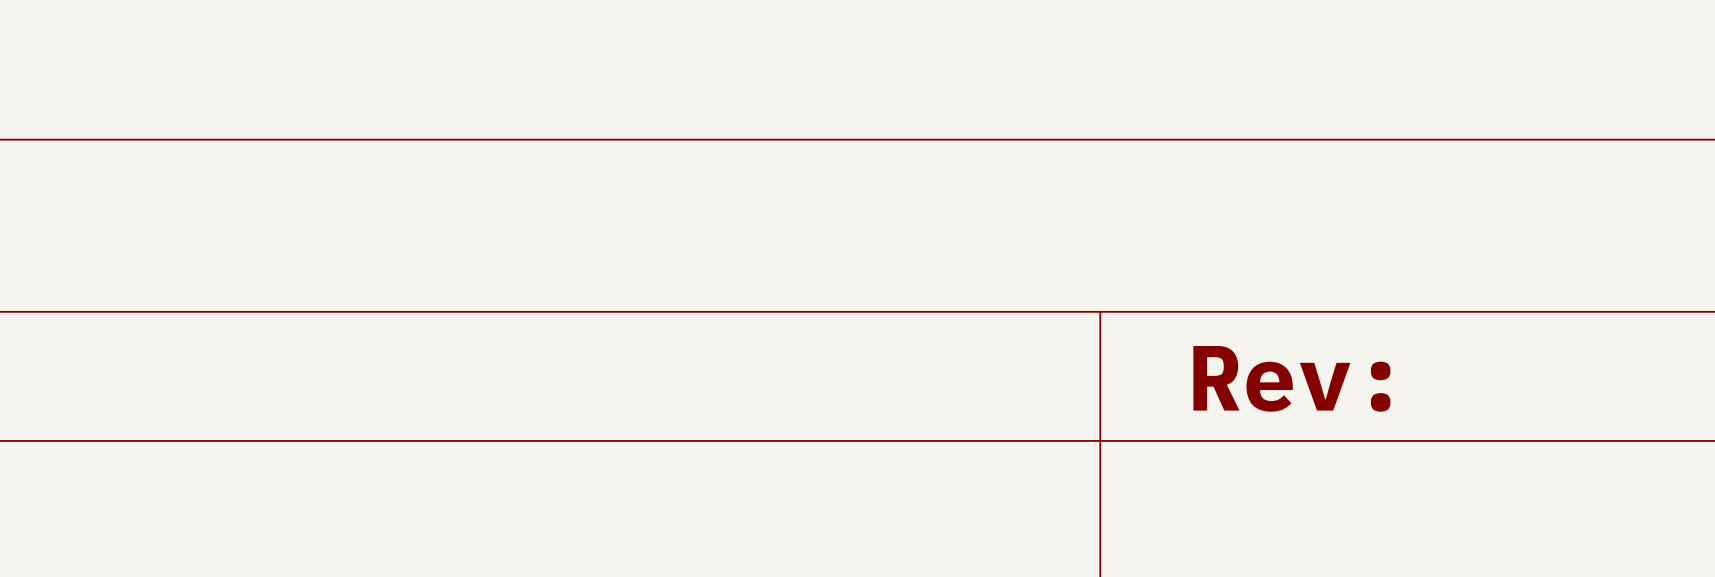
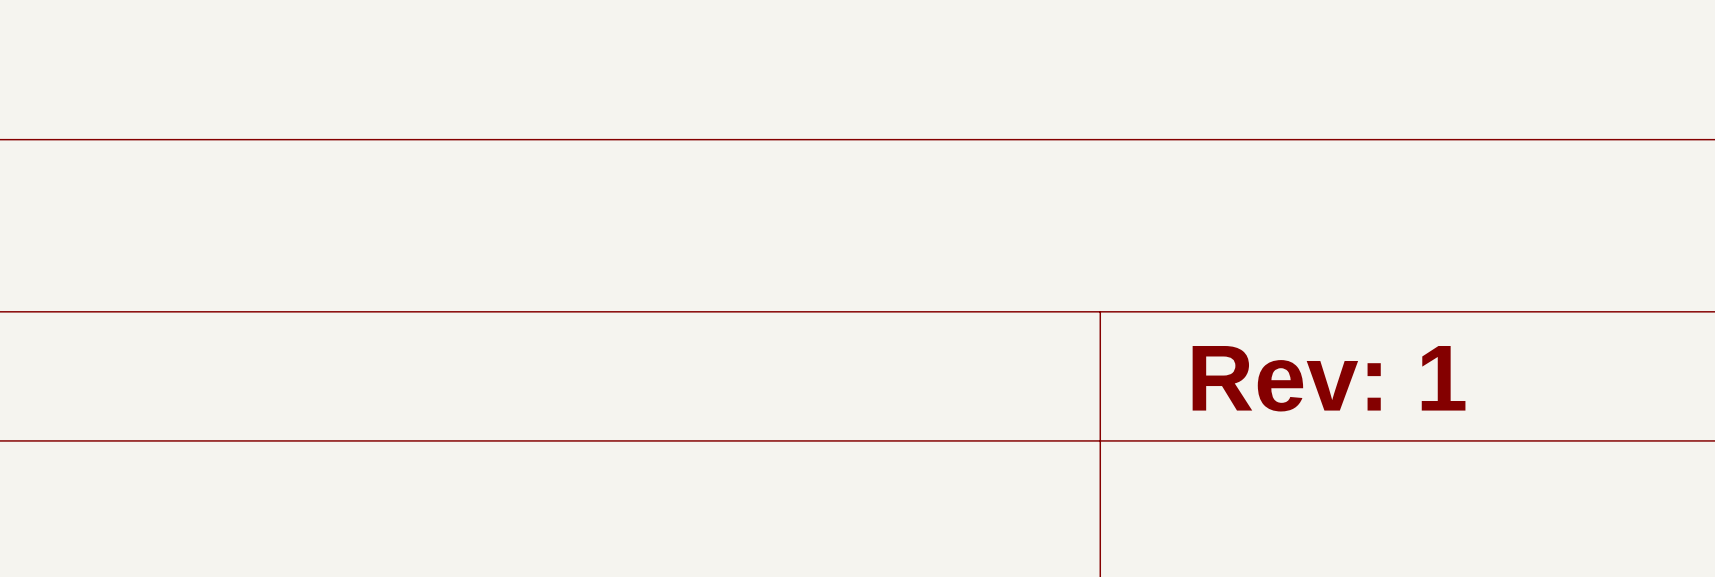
title block: Rev: (1291, 378) -> Rev: 1 (1329, 378)

